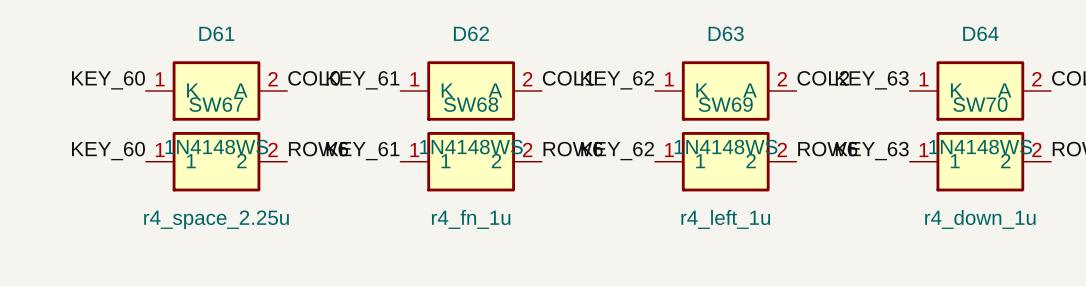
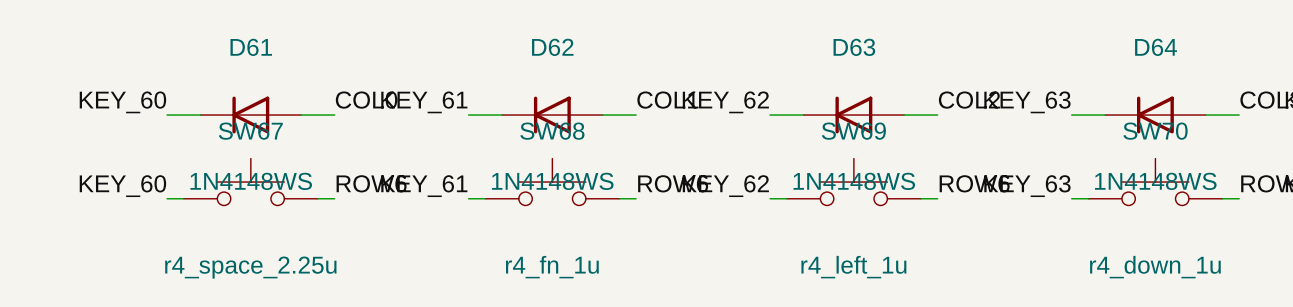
D61 symbol: [145, 61, 288, 121] -> [200, 96, 302, 134]
D62 symbol: [400, 61, 542, 121] -> [502, 96, 603, 134]
D63 symbol: [655, 61, 797, 121] -> [803, 96, 905, 134]
D64 symbol: [909, 61, 1052, 121] -> [1105, 96, 1206, 134]
SW67 symbol: [145, 132, 288, 192] -> [183, 158, 318, 206]
SW68 symbol: [400, 132, 542, 192] -> [485, 158, 620, 206]
SW69 symbol: [655, 132, 797, 192] -> [786, 158, 921, 206]
SW70 symbol: [909, 132, 1052, 192] -> [1088, 158, 1223, 206]

